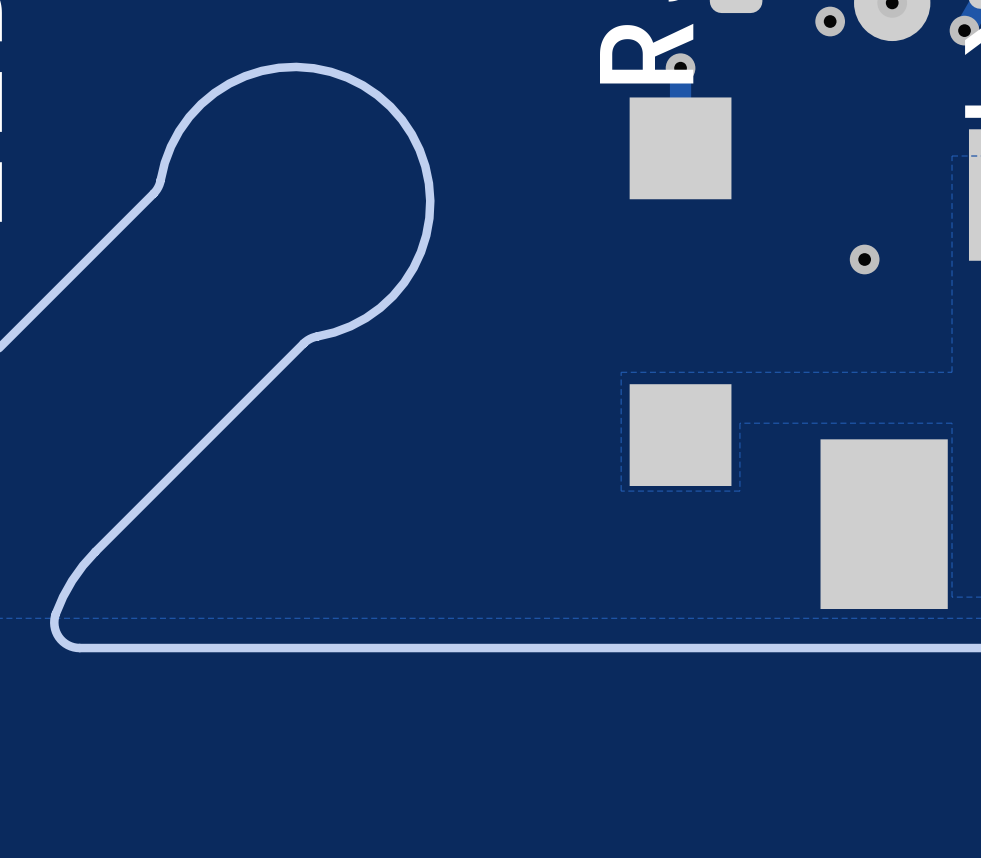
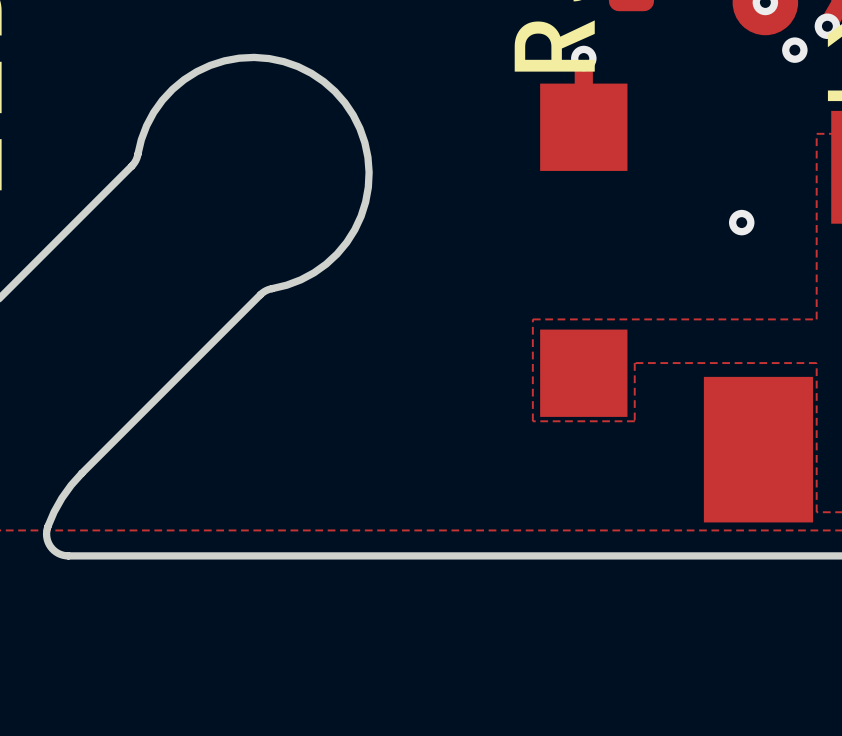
via position: (830, 21) -> (794, 50)

